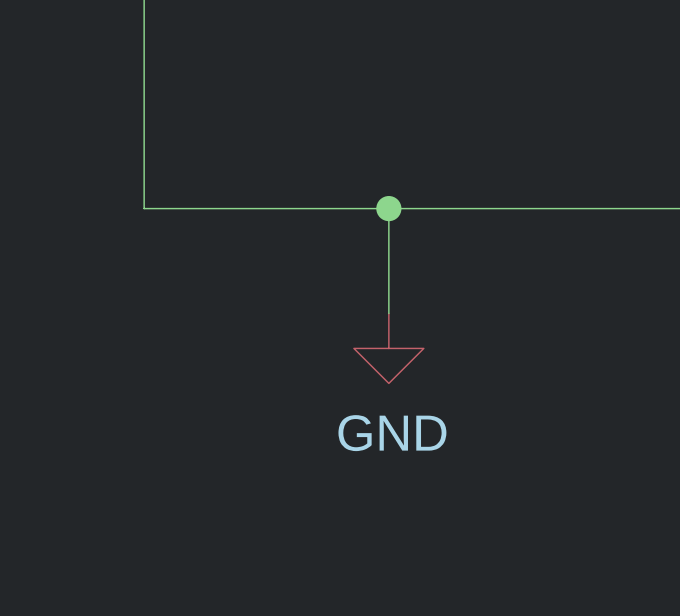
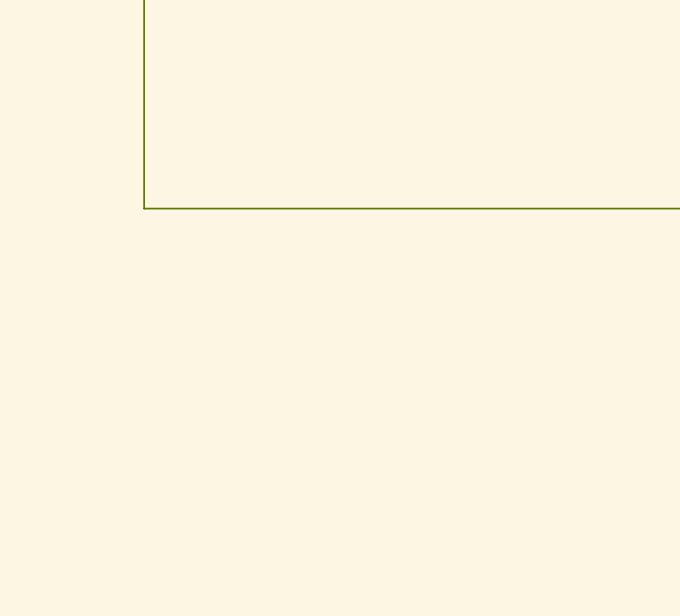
wire: (388, 208) (388, 313) -> none
junction: (388, 208) -> none
power symbol: GND (388, 348) -> none

